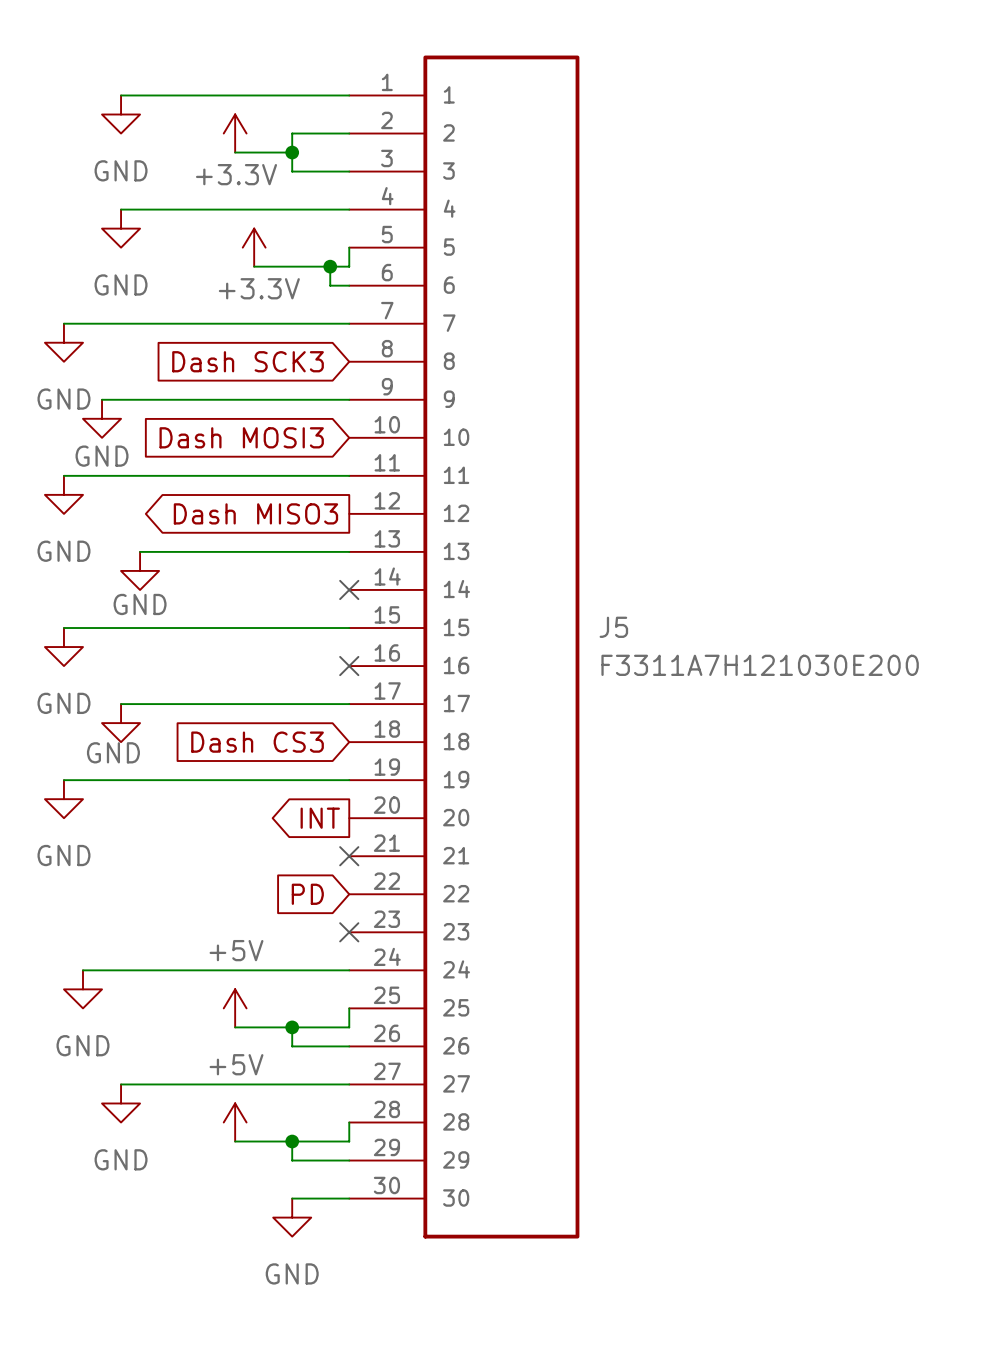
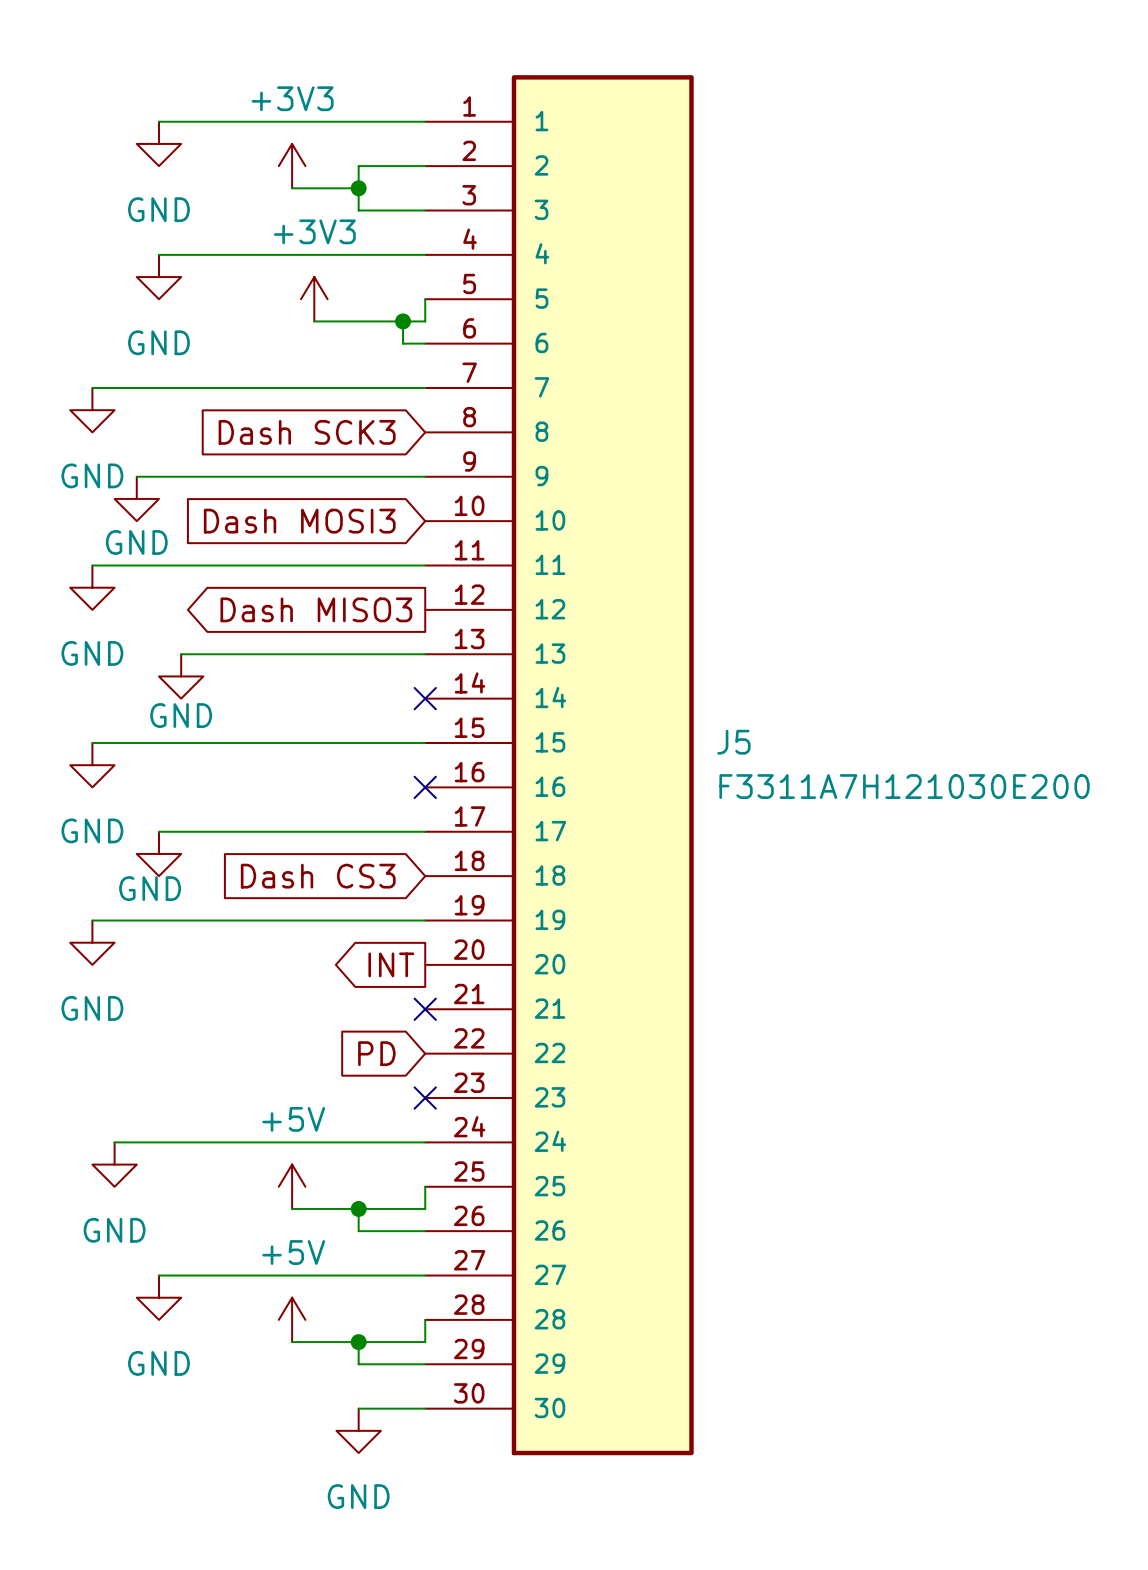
power symbol: +3.3V (235, 133) -> +3V3 (292, 166)
power symbol: +3.3V (254, 247) -> +3V3 (314, 299)

